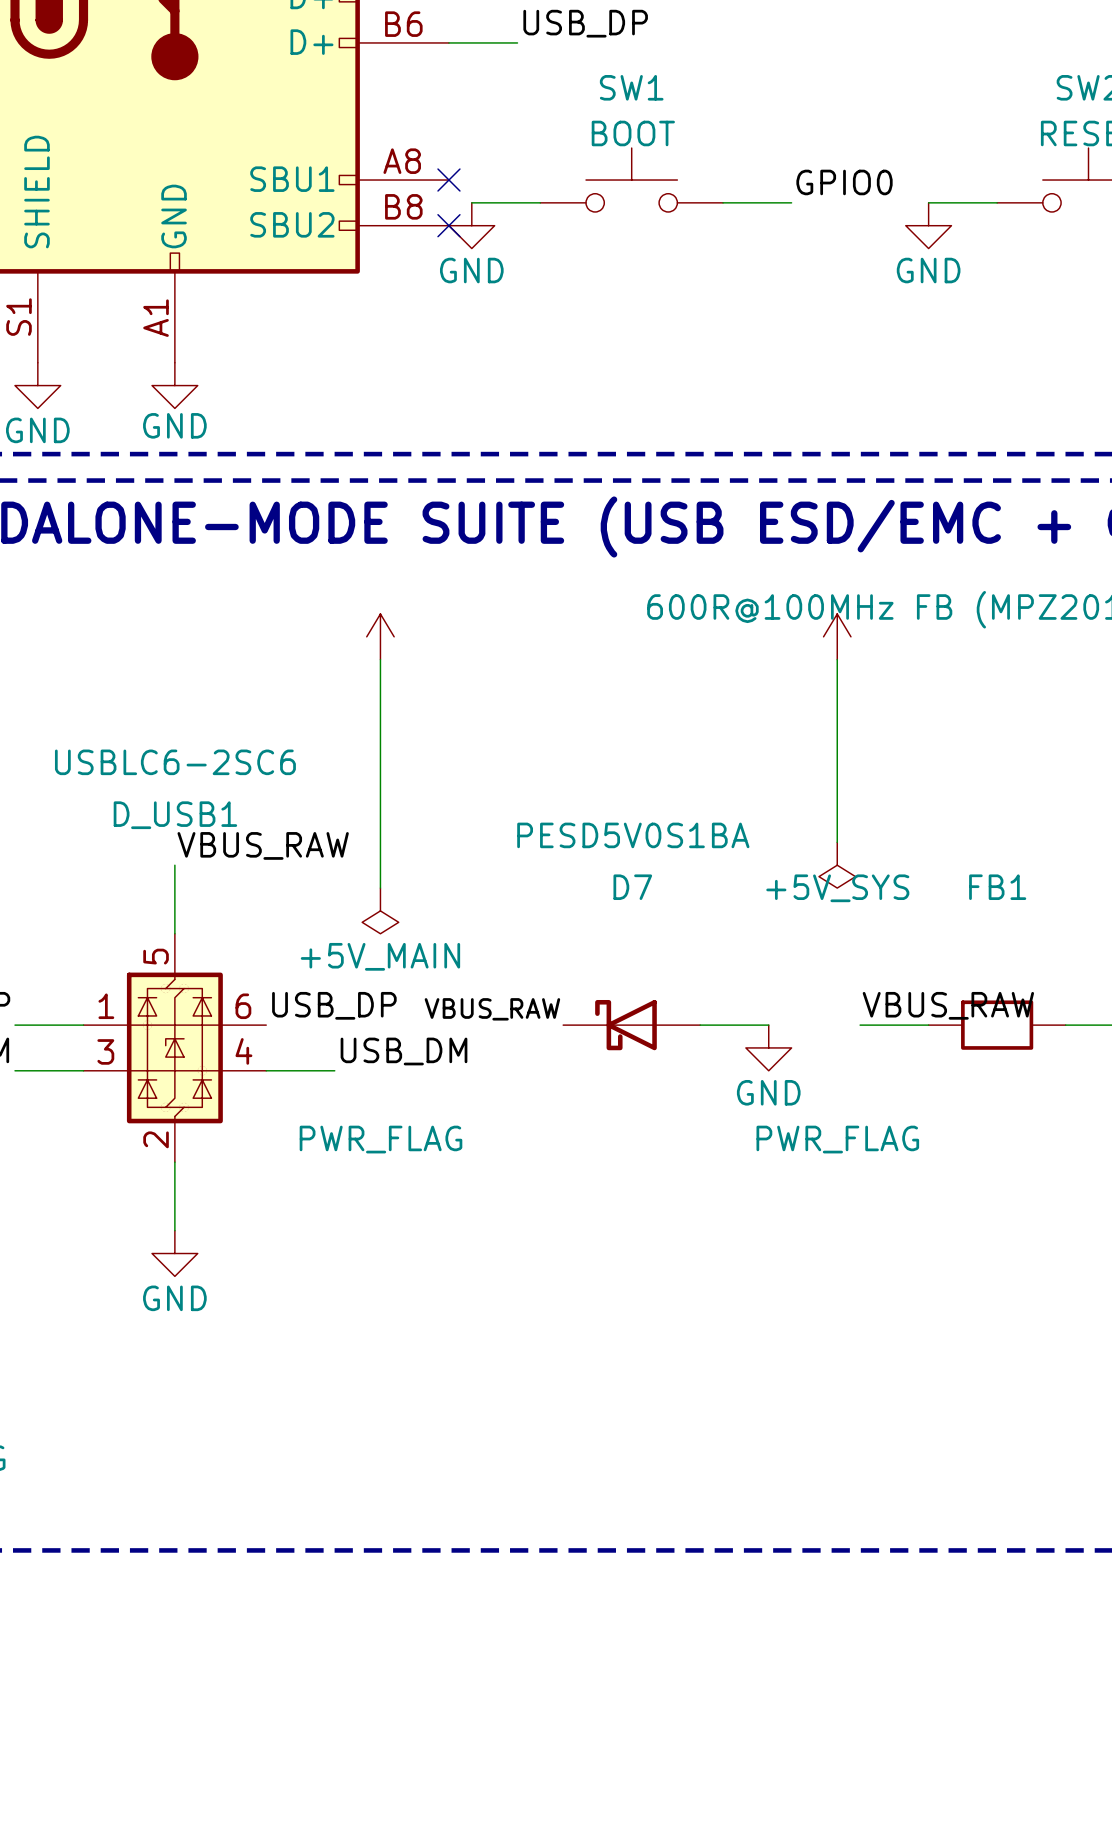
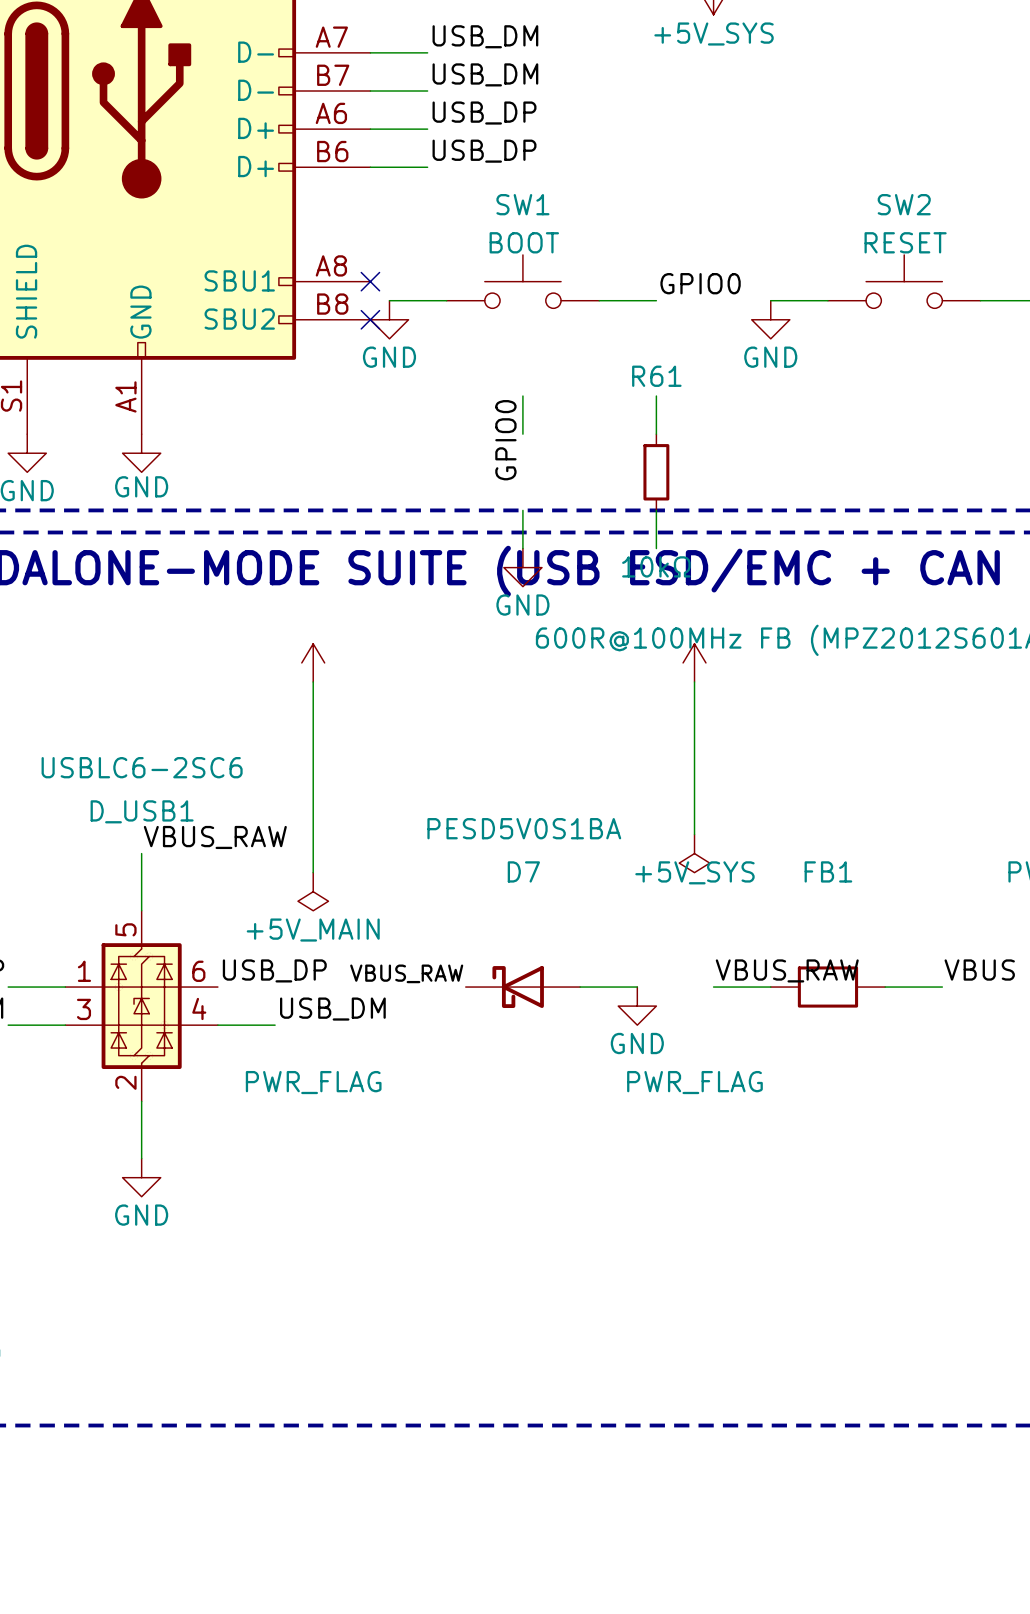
wire: none -> (522, 396) (522, 434)
wire: none -> (656, 396) (656, 434)
label: none -> GPIO0 (505, 440)
R61: none -> 10kΩ (656, 472)
wire: none -> (522, 510) (522, 548)
wire: none -> (656, 510) (656, 548)
power symbol: none -> GND (522, 567)

